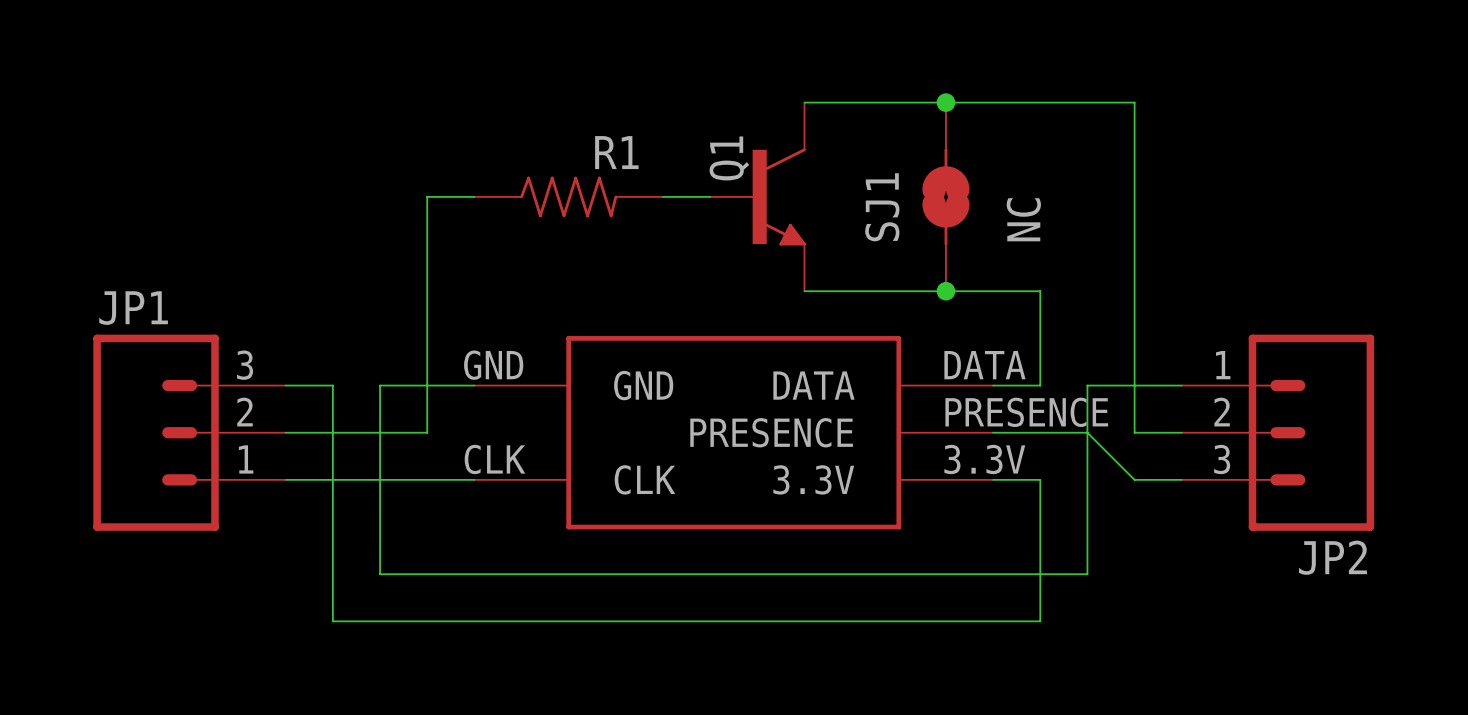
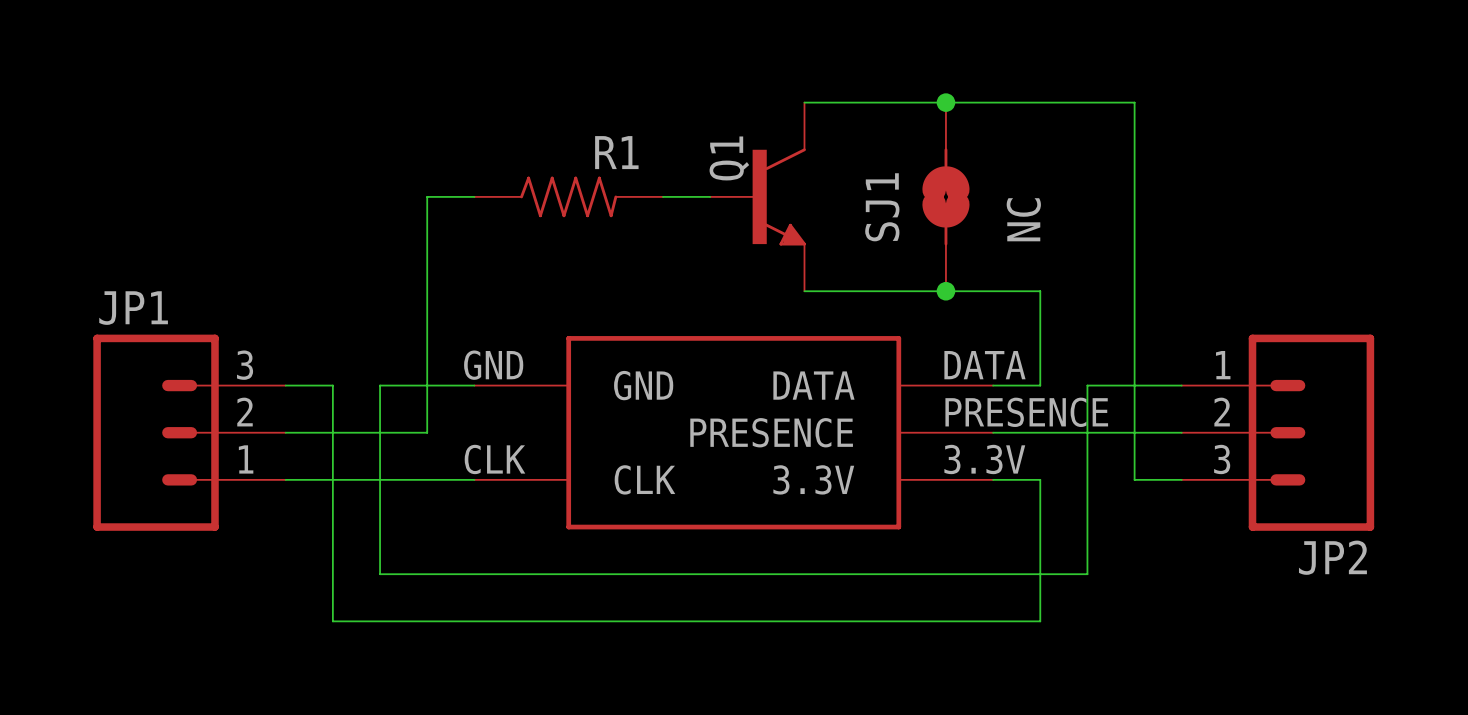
wire: (1087, 432) (1134, 479) -> (1087, 432) (1134, 432) (1134, 479)

